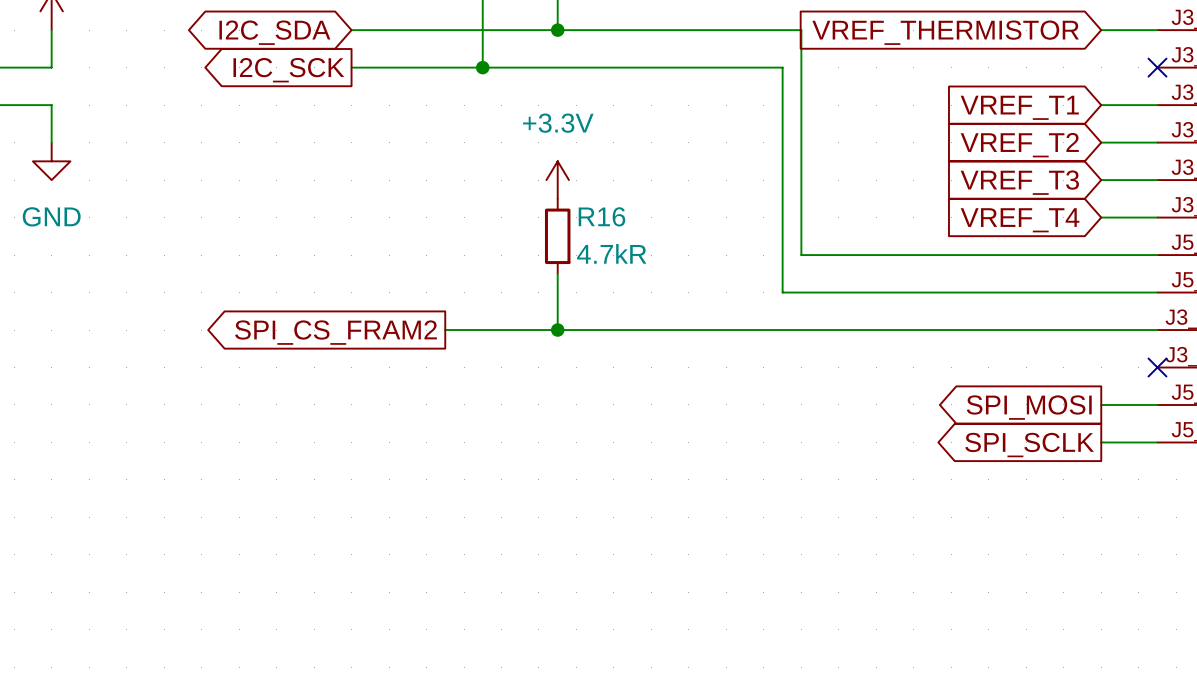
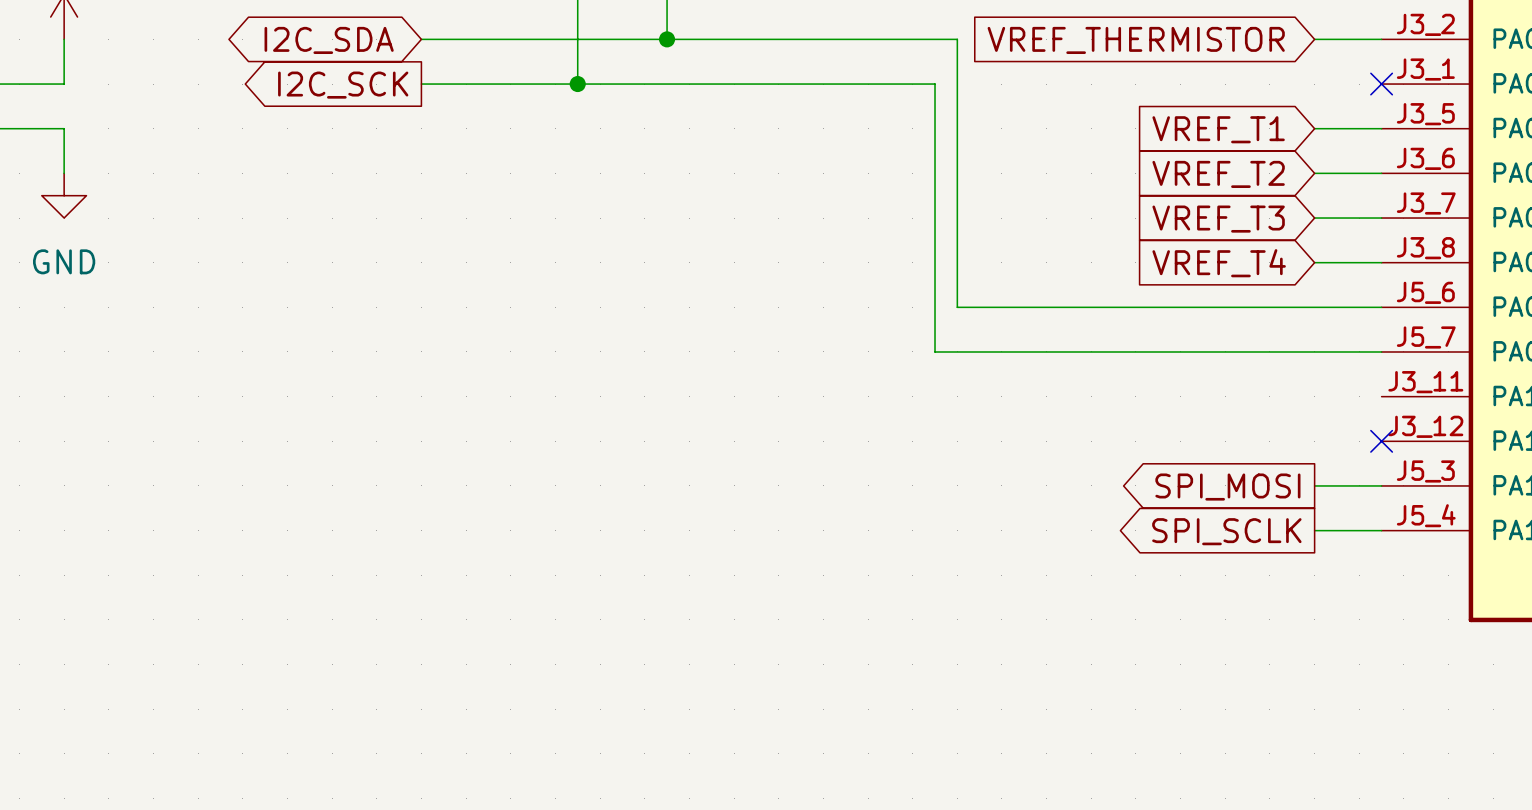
power symbol: +3.3V (557, 180) -> none
R16: 4.7kR (557, 236) -> none
wire: (557, 273) (557, 330) -> none
wire: (445, 330) (1157, 330) -> none
junction: (557, 330) -> none
global label: SPI_CS_FRAM2 (335, 332) -> none

